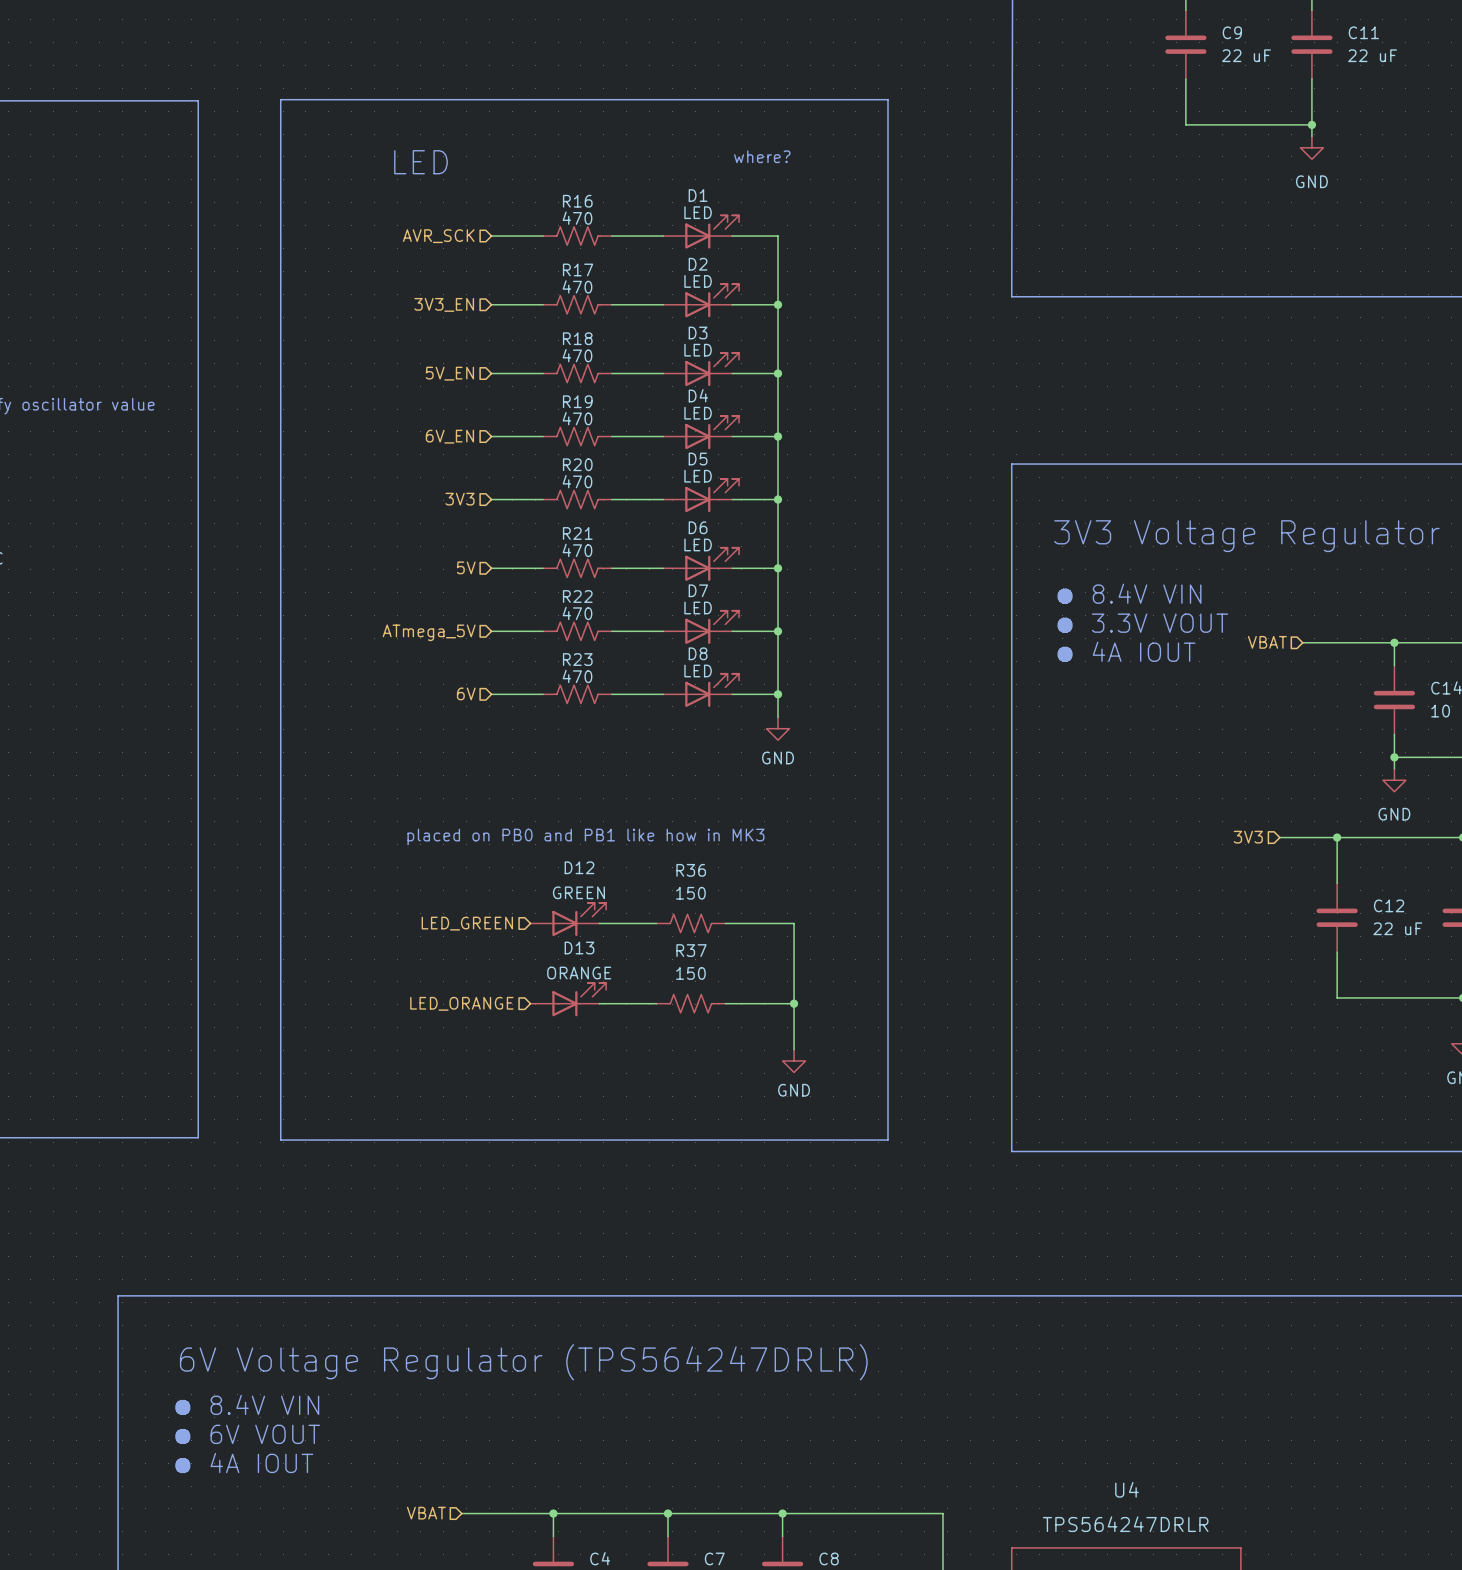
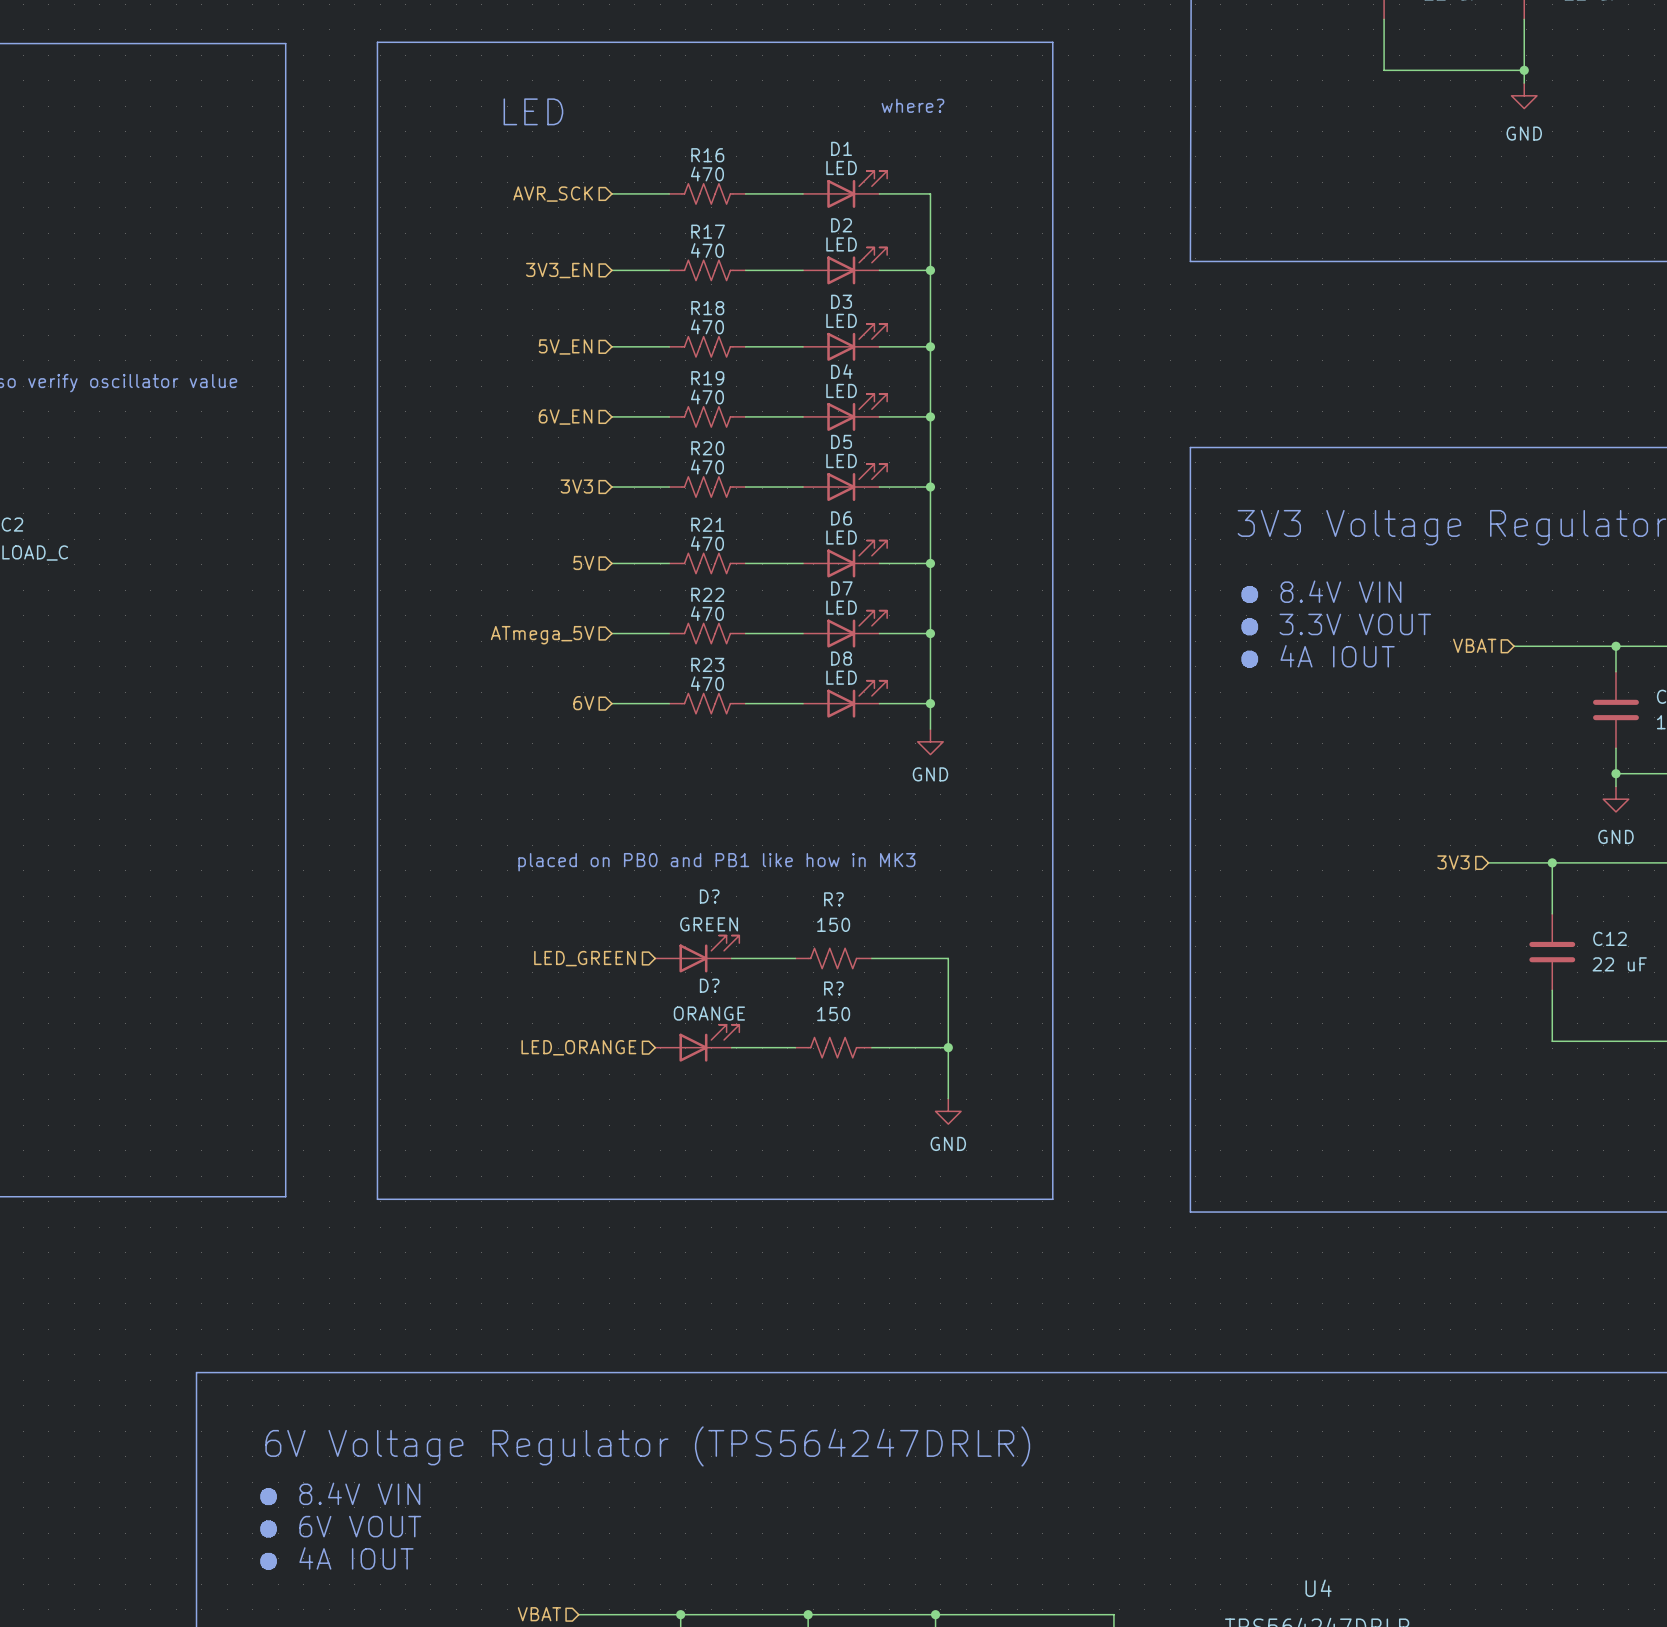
D12 name: D12 (579, 867) -> D? (709, 896)
R36 name: R36 (691, 870) -> R? (833, 899)
D13 name: D13 (579, 948) -> D? (709, 985)
R37 name: R37 (691, 950) -> R? (833, 988)

